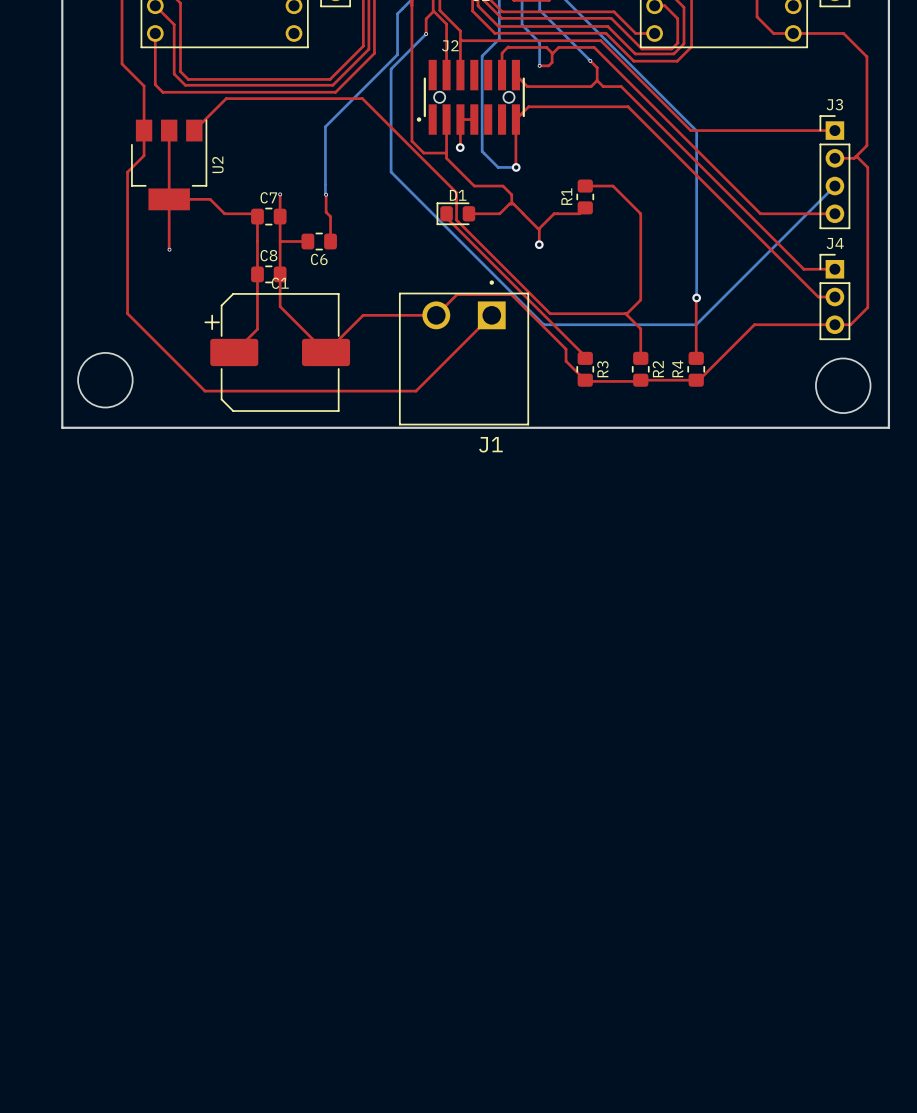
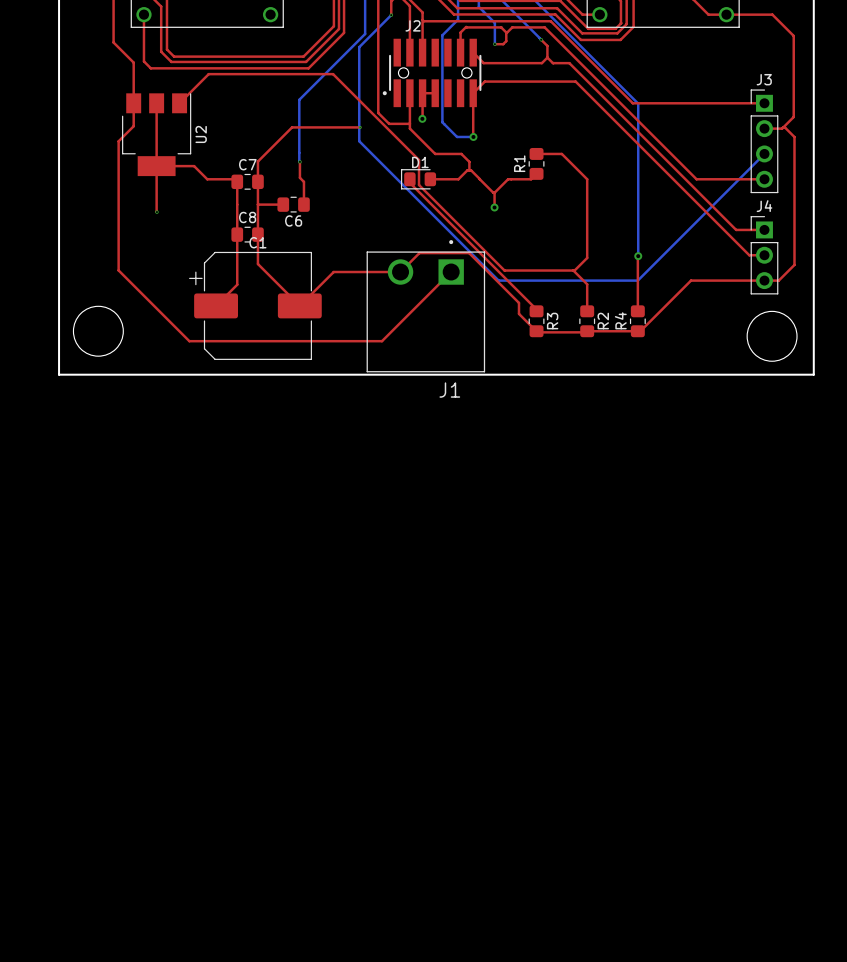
top track: none -> (360, 127) (292, 127) (257, 161)
via: none -> (360, 127)
via: (280, 194) -> none

